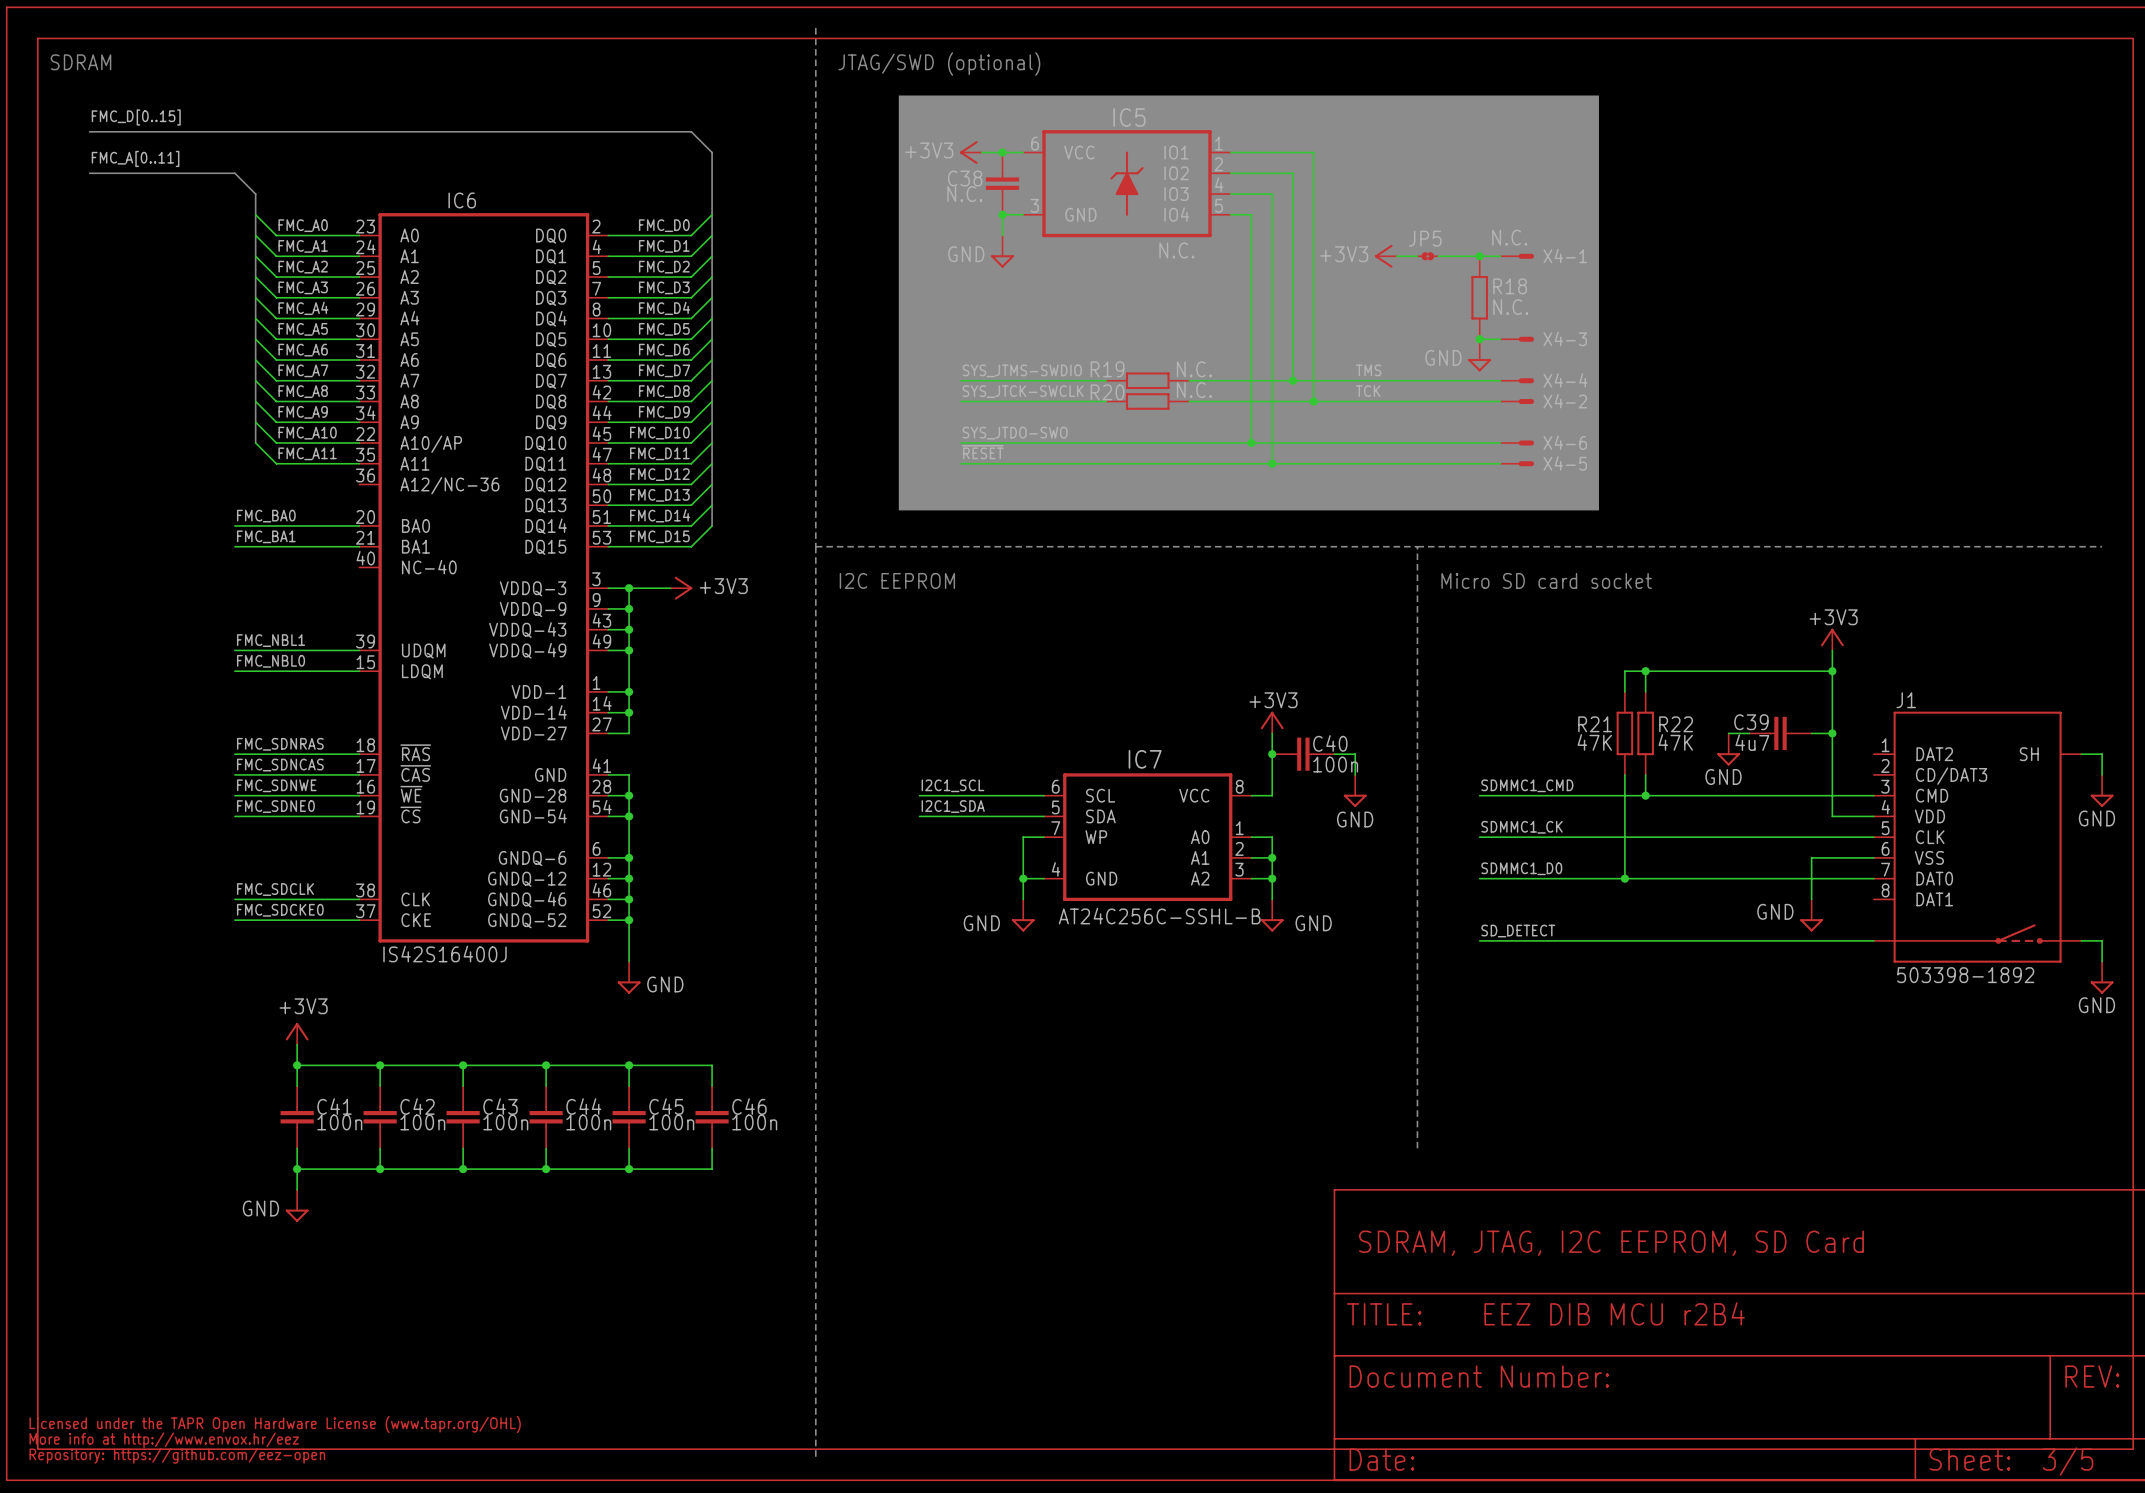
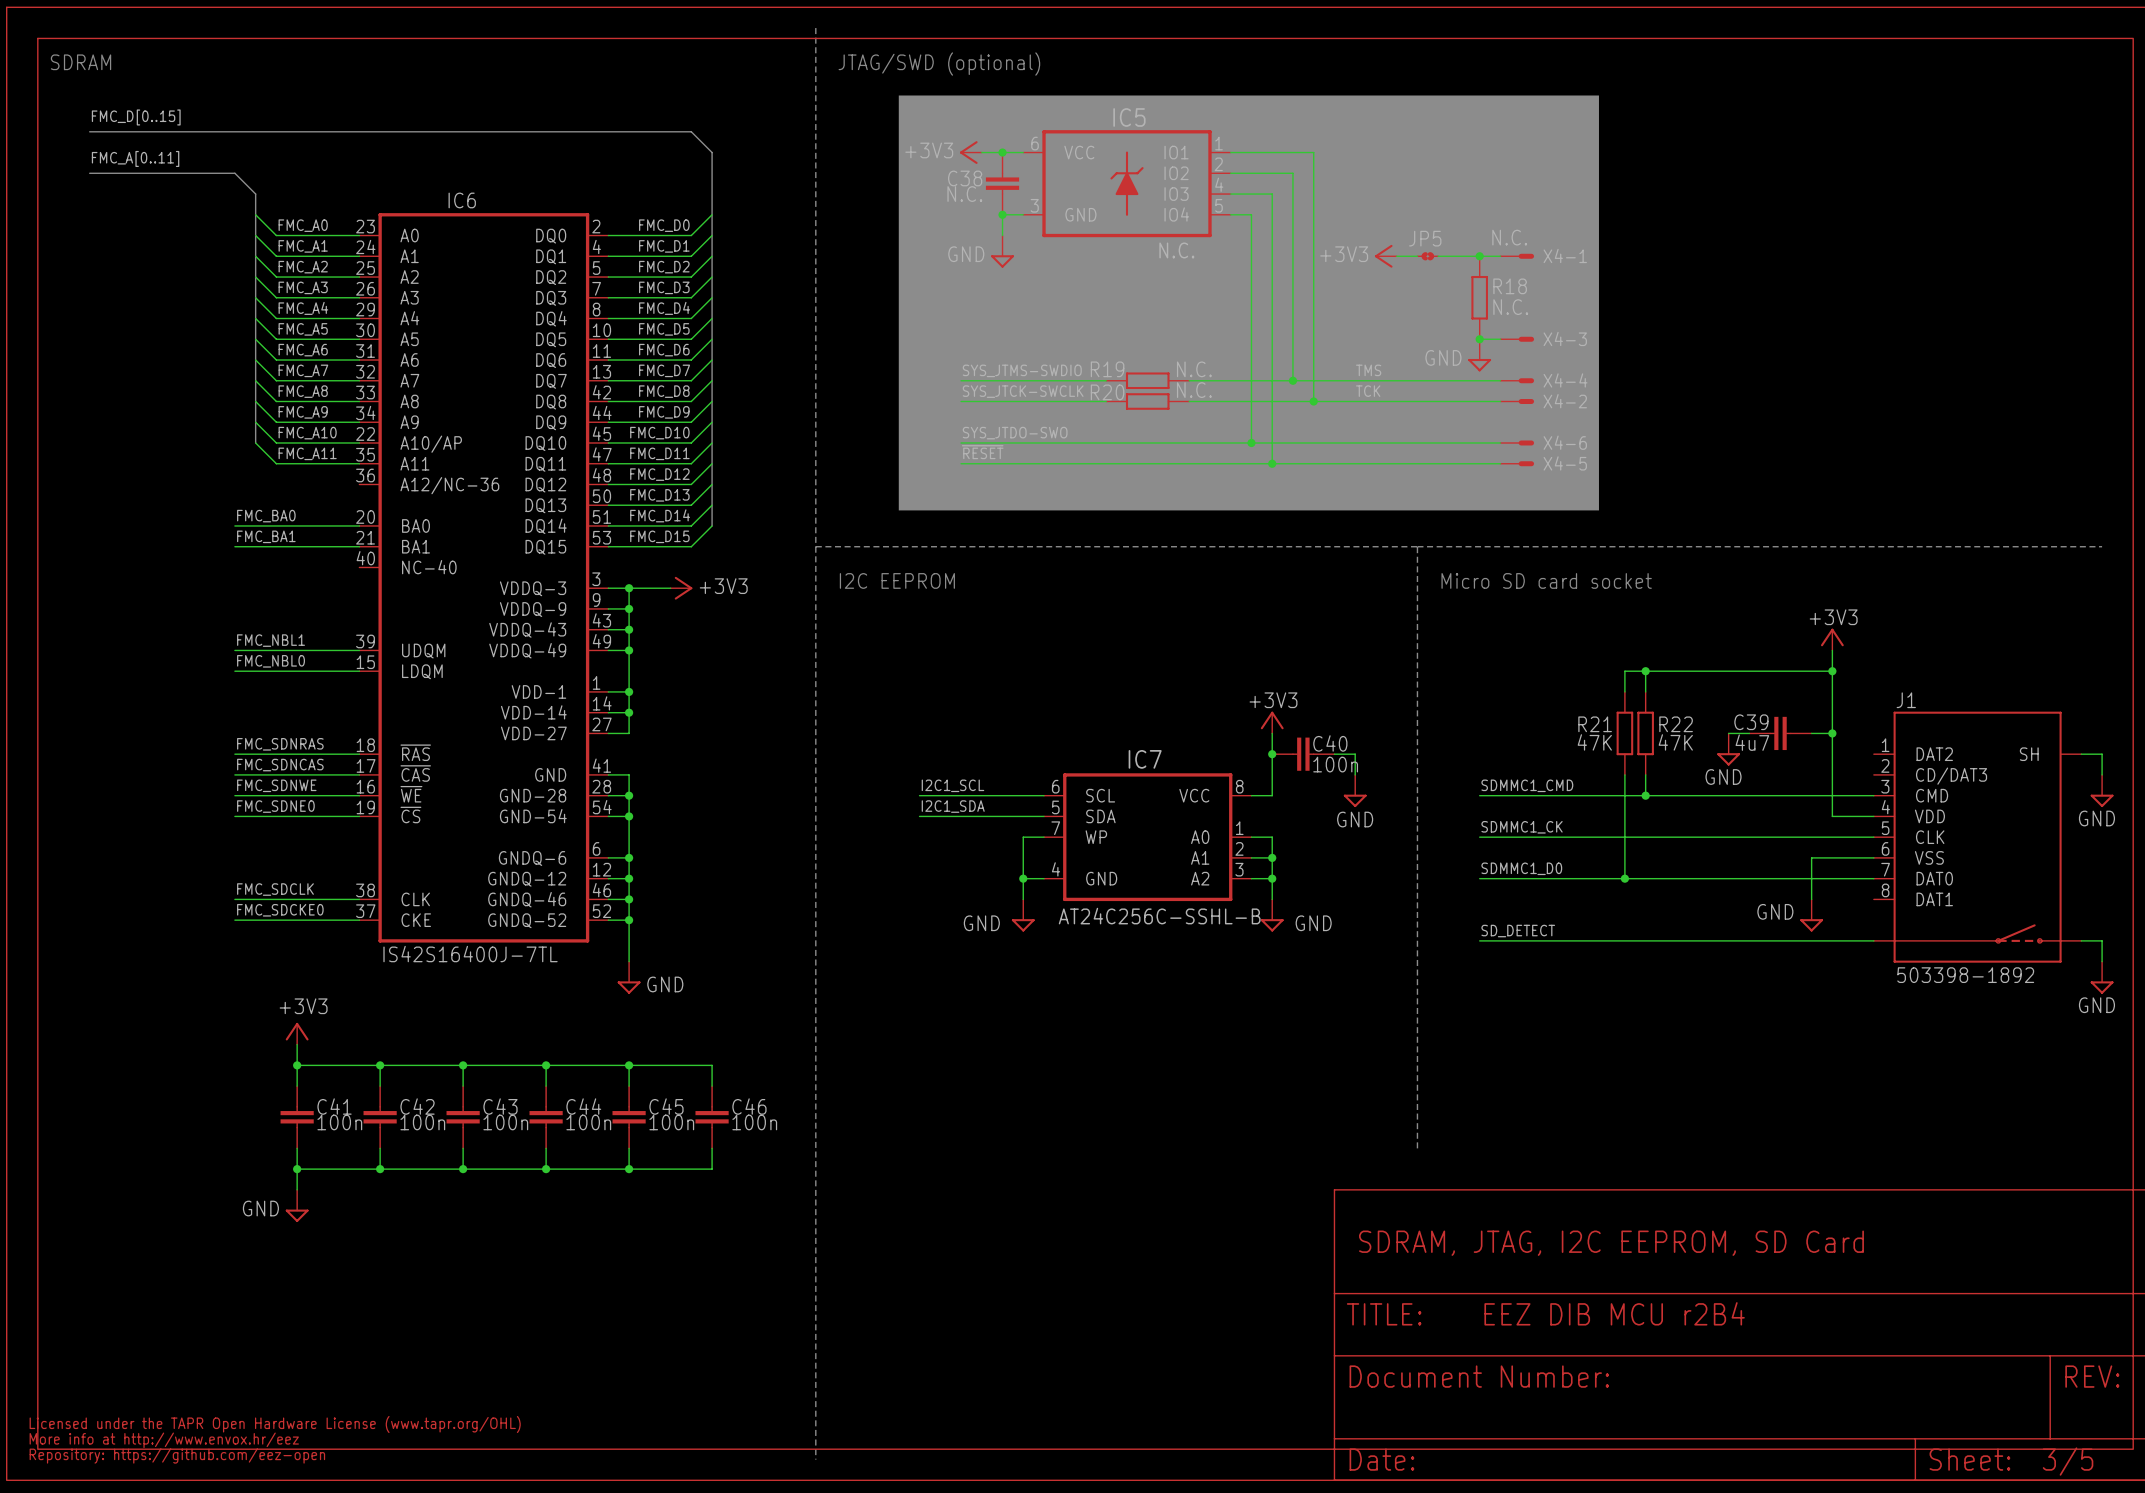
IC6 value: IS42S16400J (445, 954) -> IS42S16400J-7TL (470, 954)

